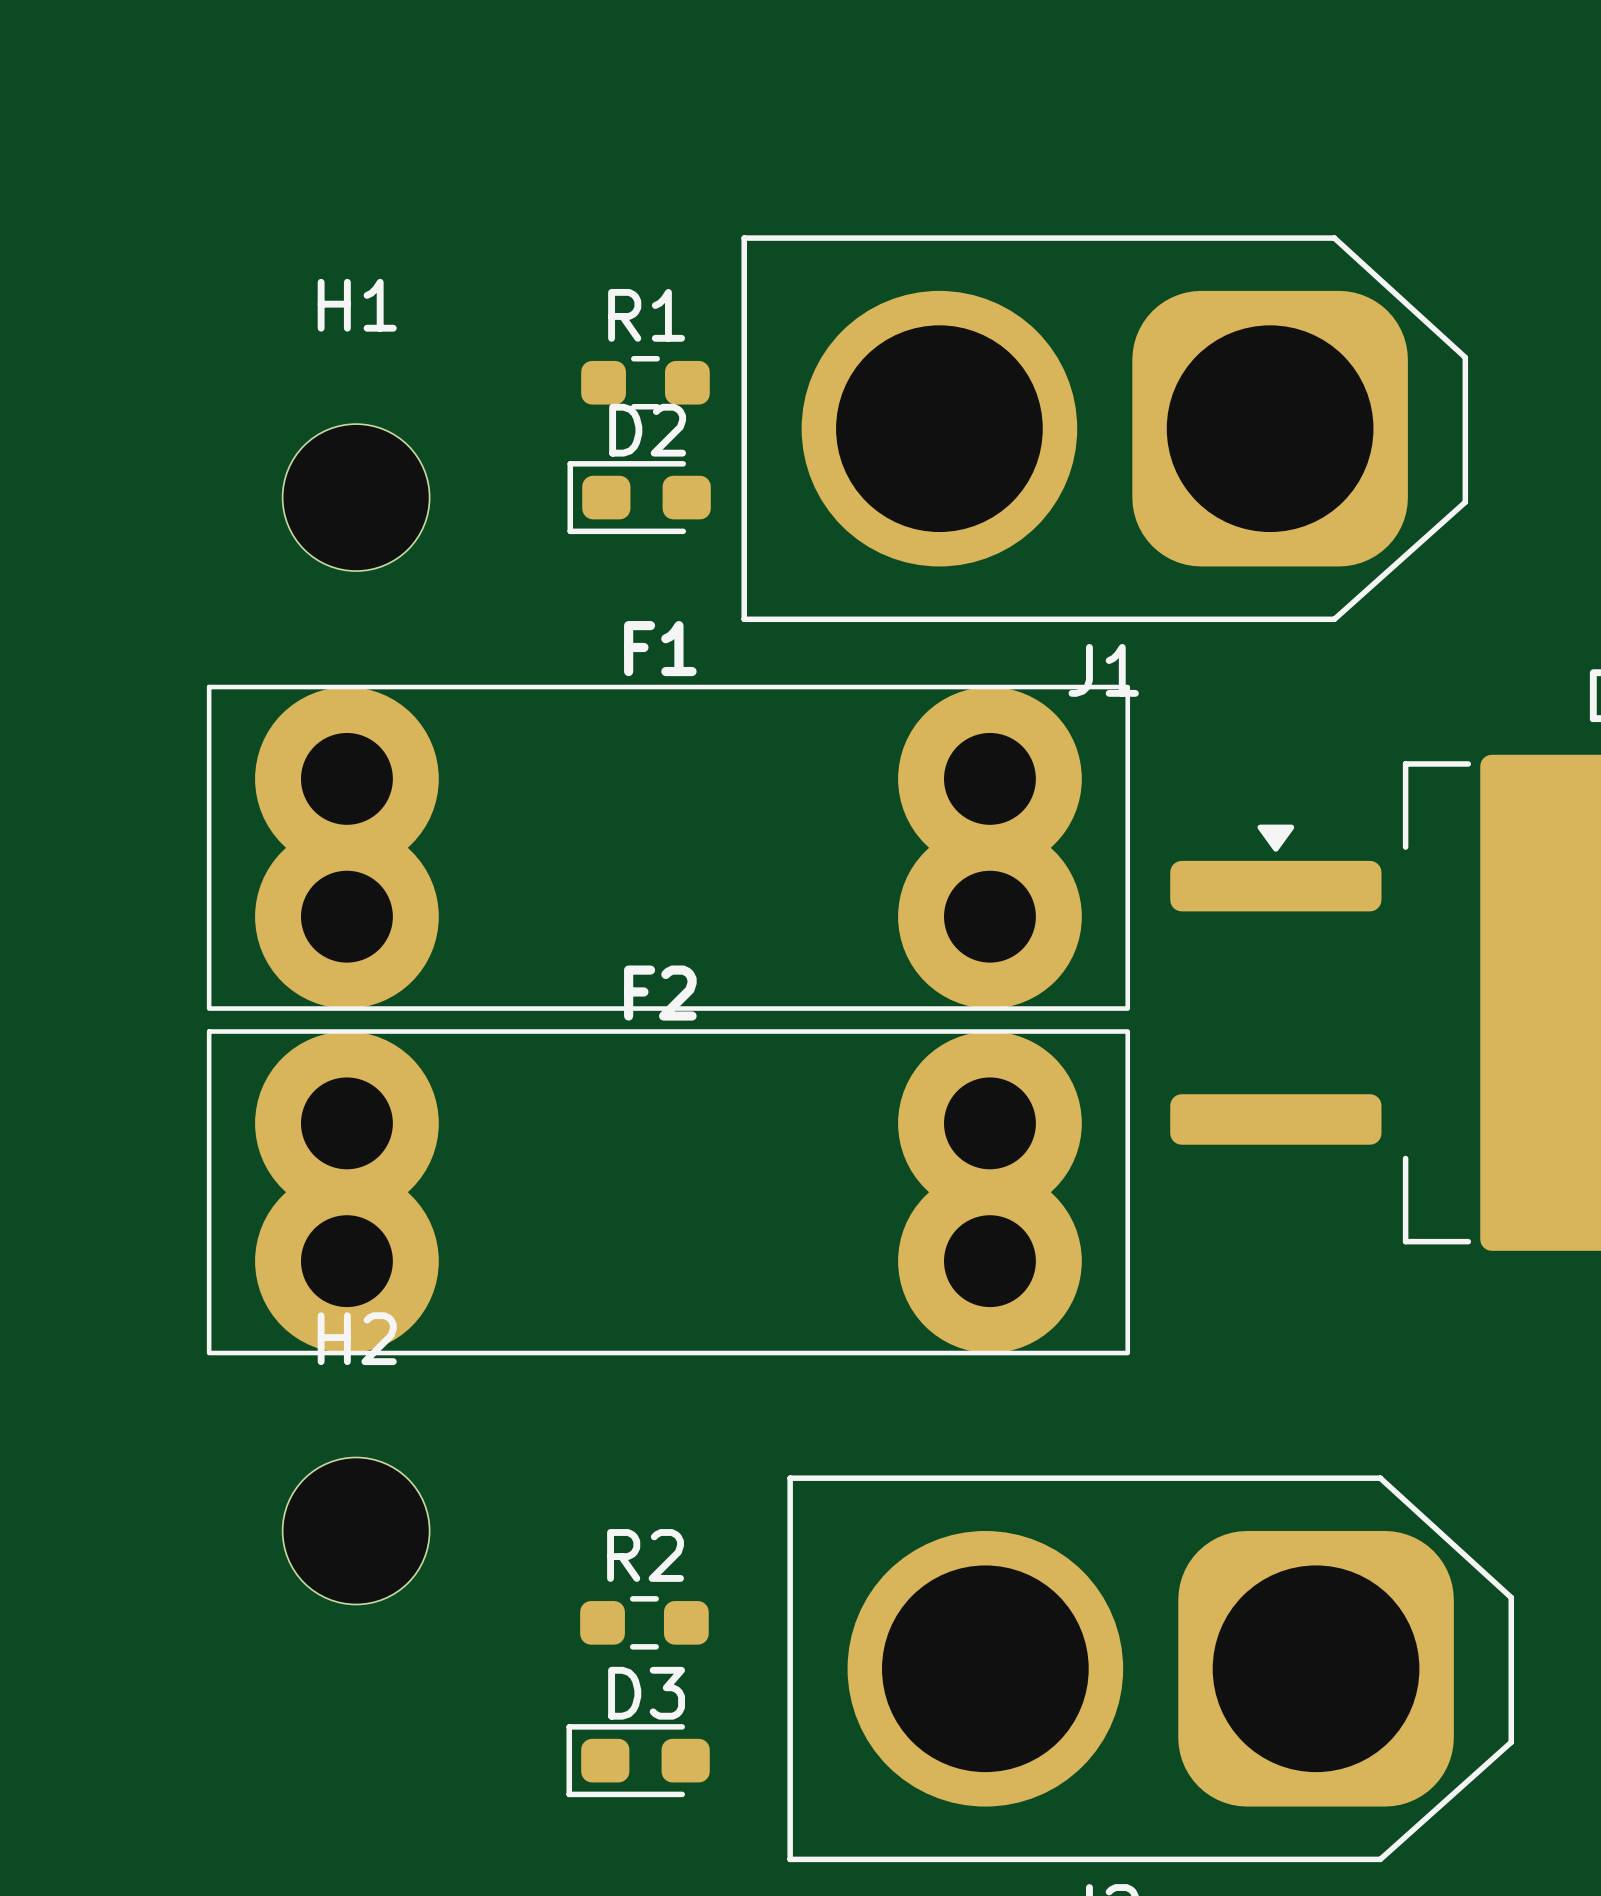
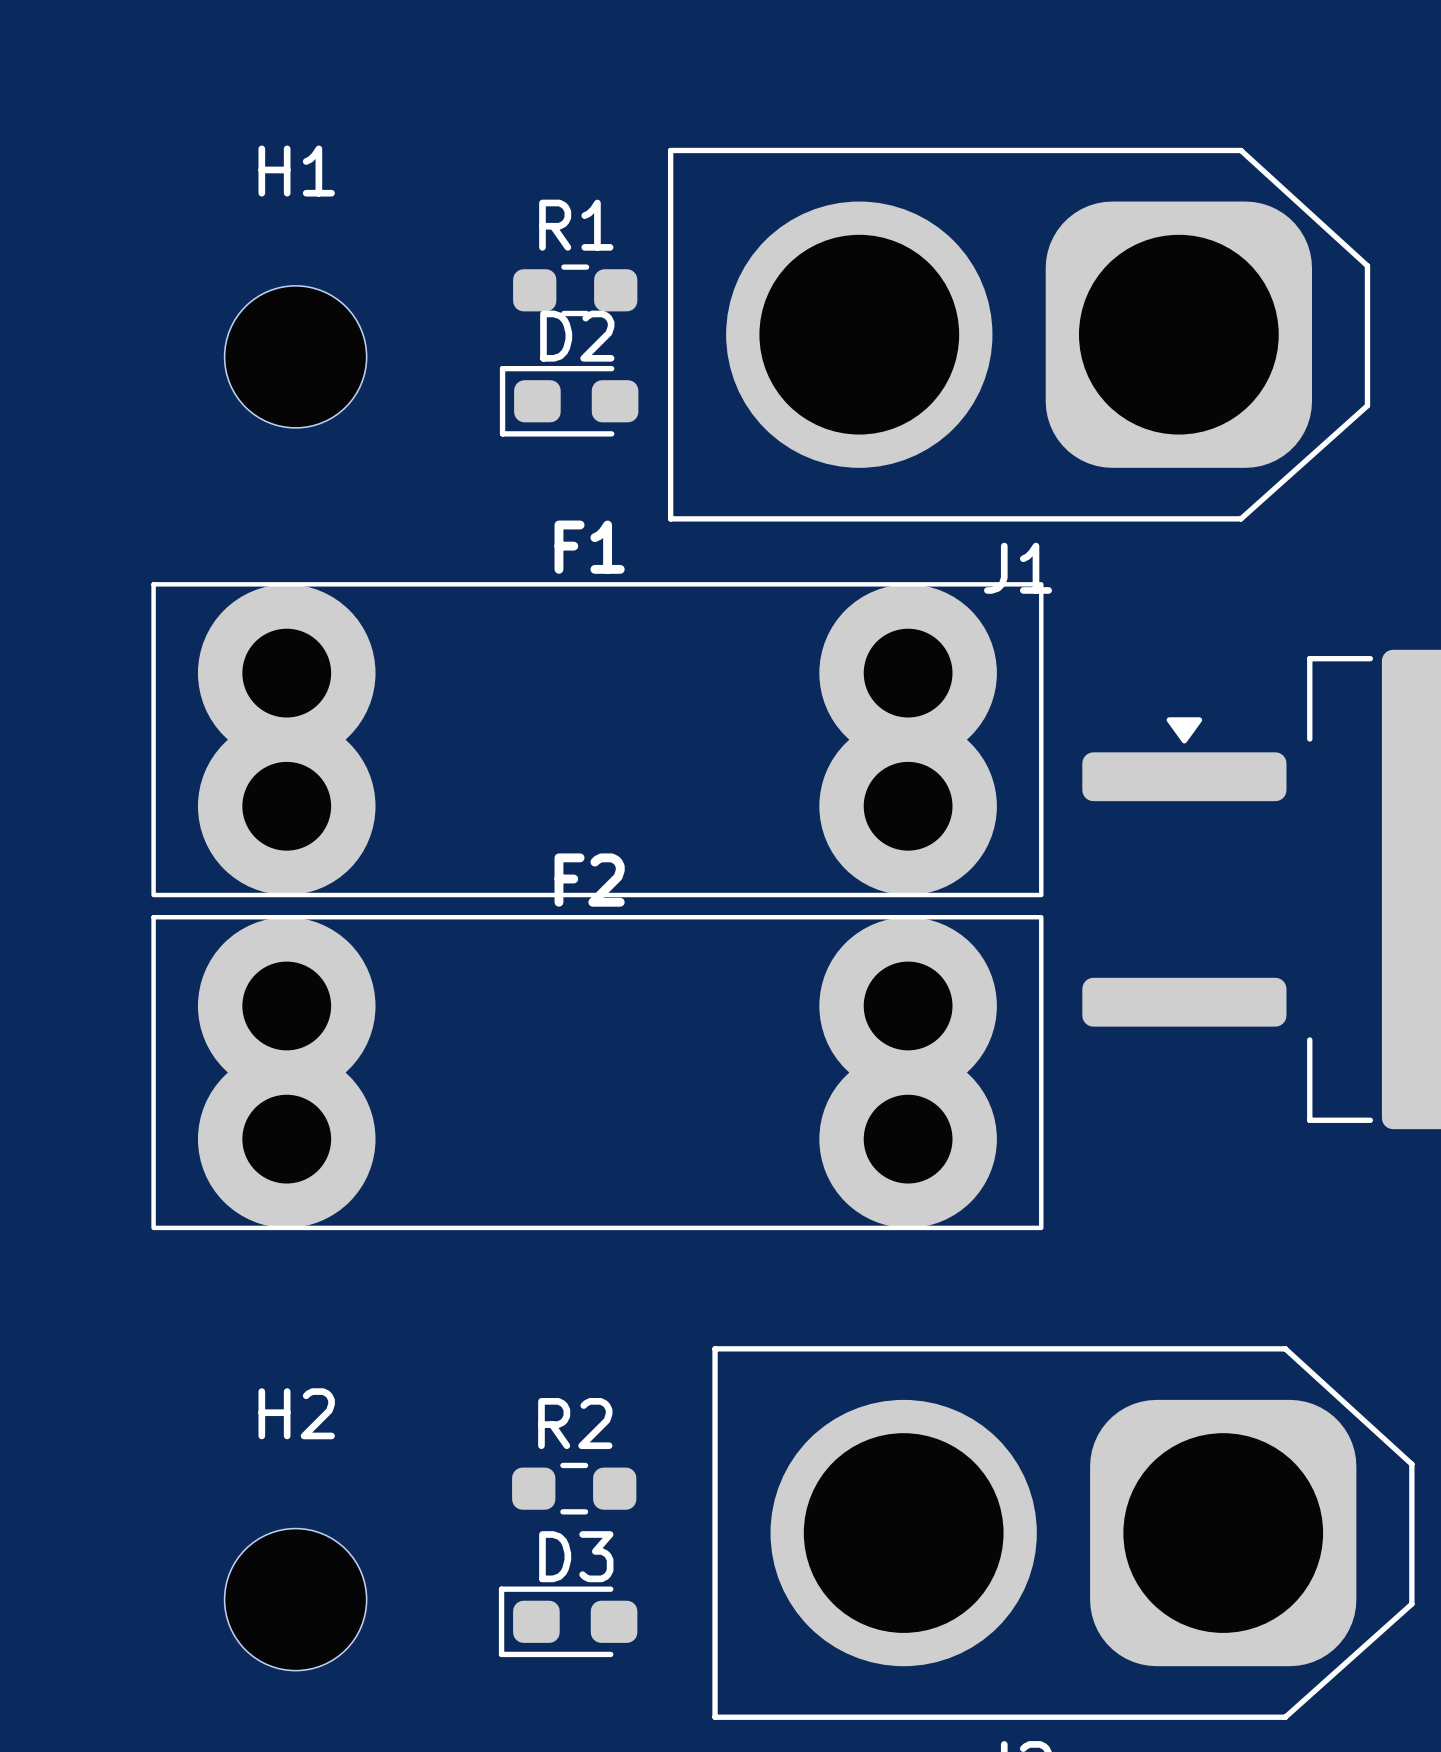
H1 position: (356, 497) -> (295, 356)
H2 position: (356, 1530) -> (295, 1599)

